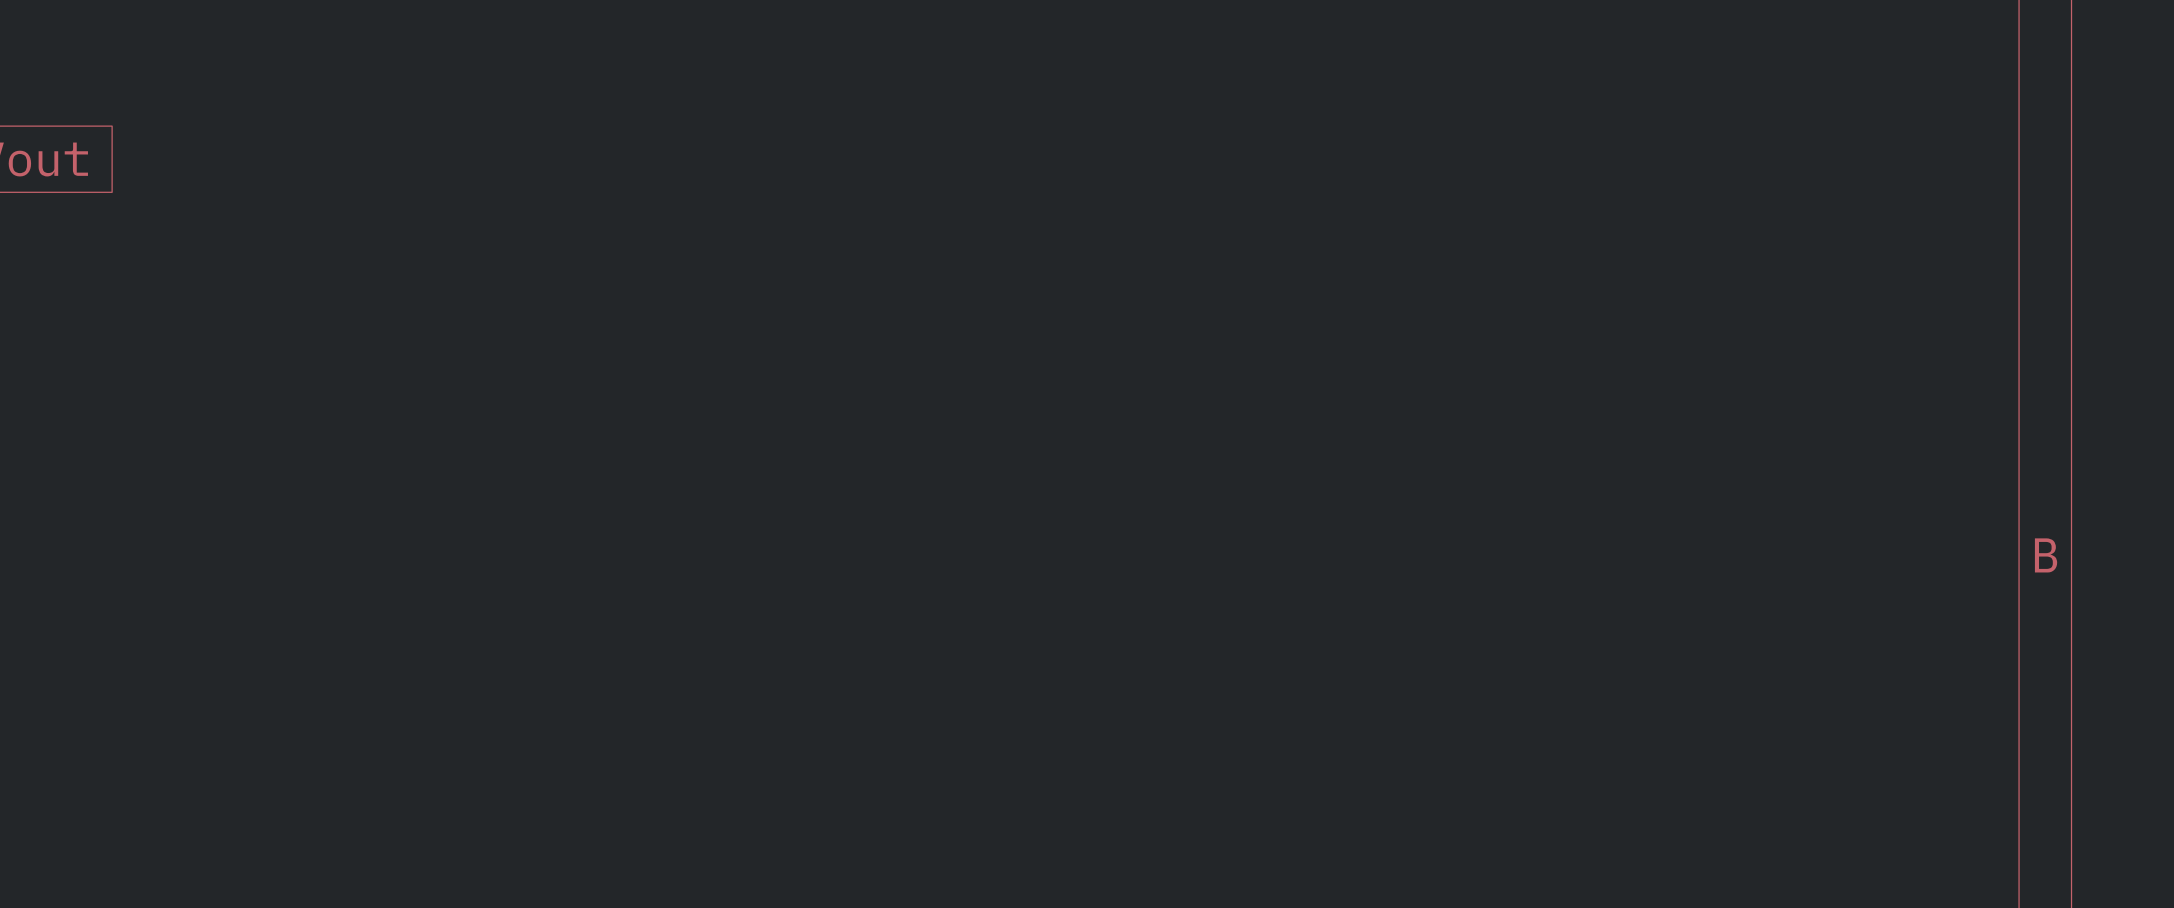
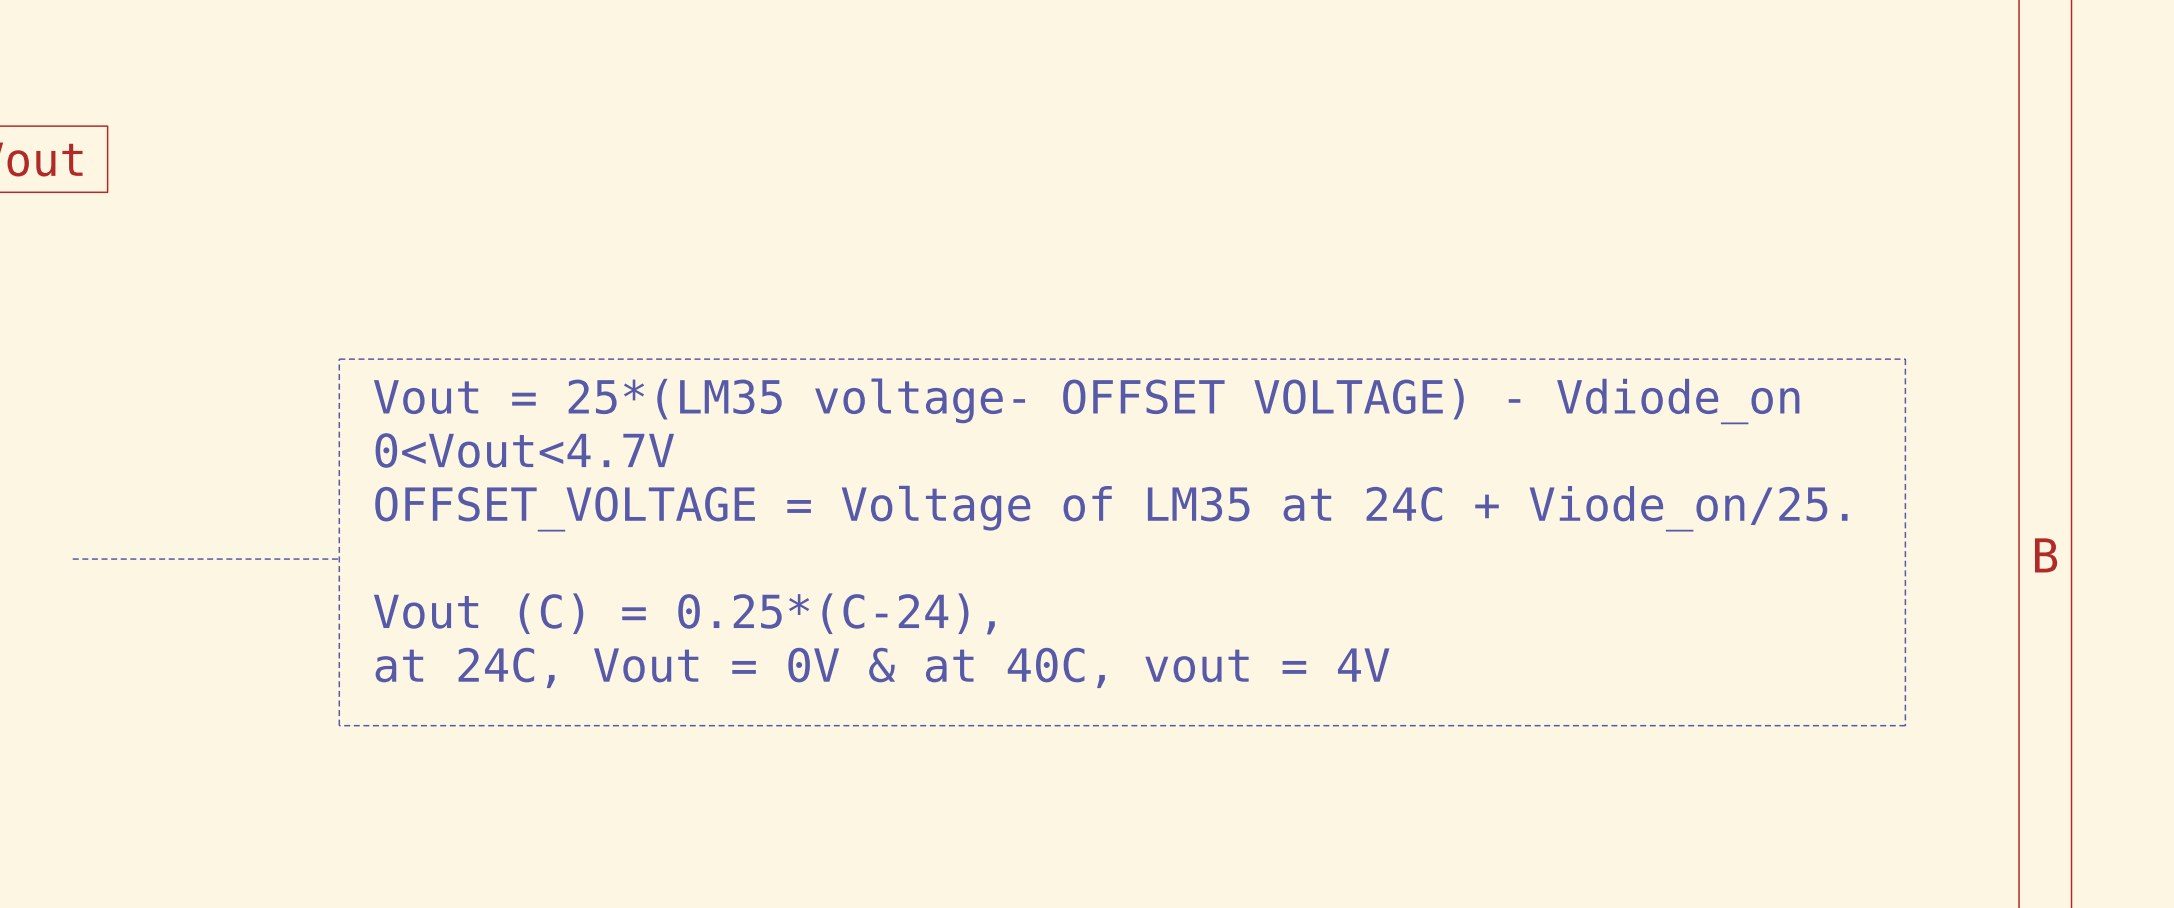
line: none -> (339, 359) (339, 725) (1905, 725) (1905, 359) (339, 359)
text: none -> Vout = 25*(LM35 voltage- OFFSET VOLTAGE) - Vdiode_on (1086, 401)
text: none -> 0<Vout<4.7V (524, 450)
text: none -> OFFSET_VOLTAGE = Voltage of LM35 at 24C + Viode_on/25. (1111, 508)
line: none -> (72, 559) (339, 559)
text: none -> Vout (C) = 0.25*(C-24), (684, 613)
text: none -> at 24C, Vout = 0V & at 40C, vout = 4V (882, 667)

